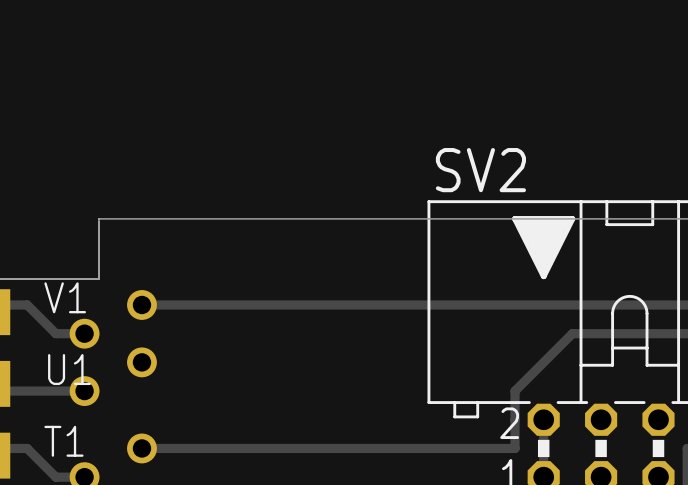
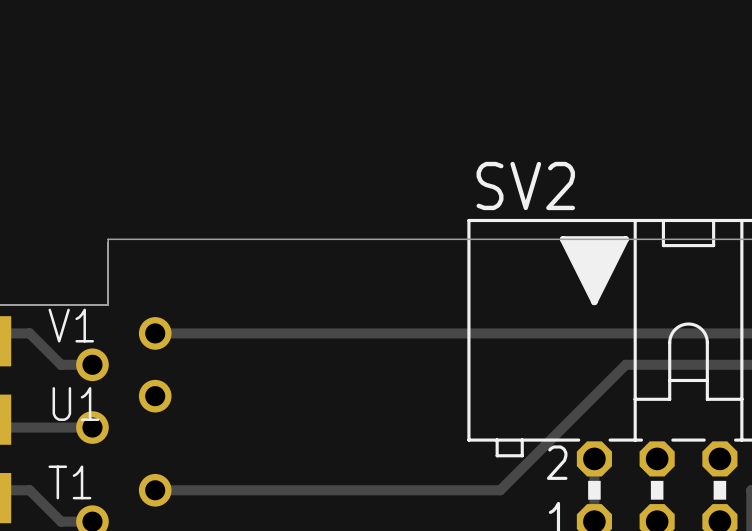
track: (515, 391) (515, 448) (457, 448) -> (563, 427) (500, 490)

